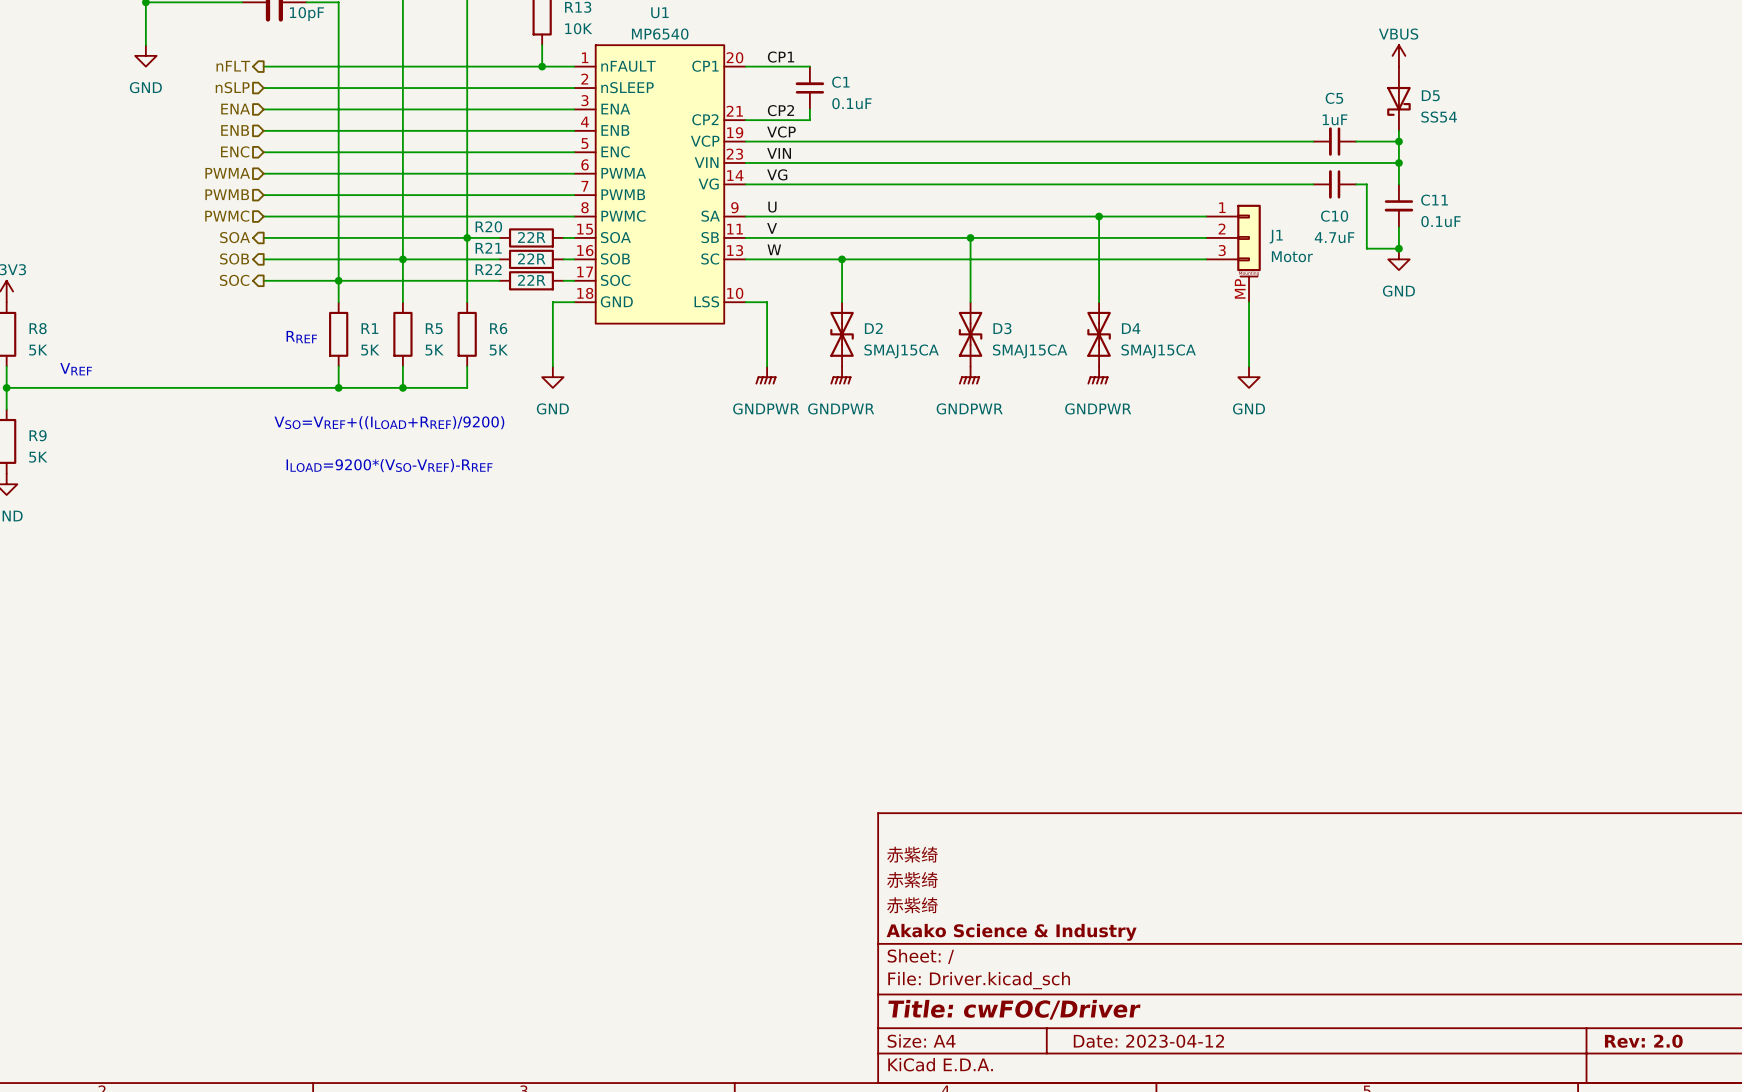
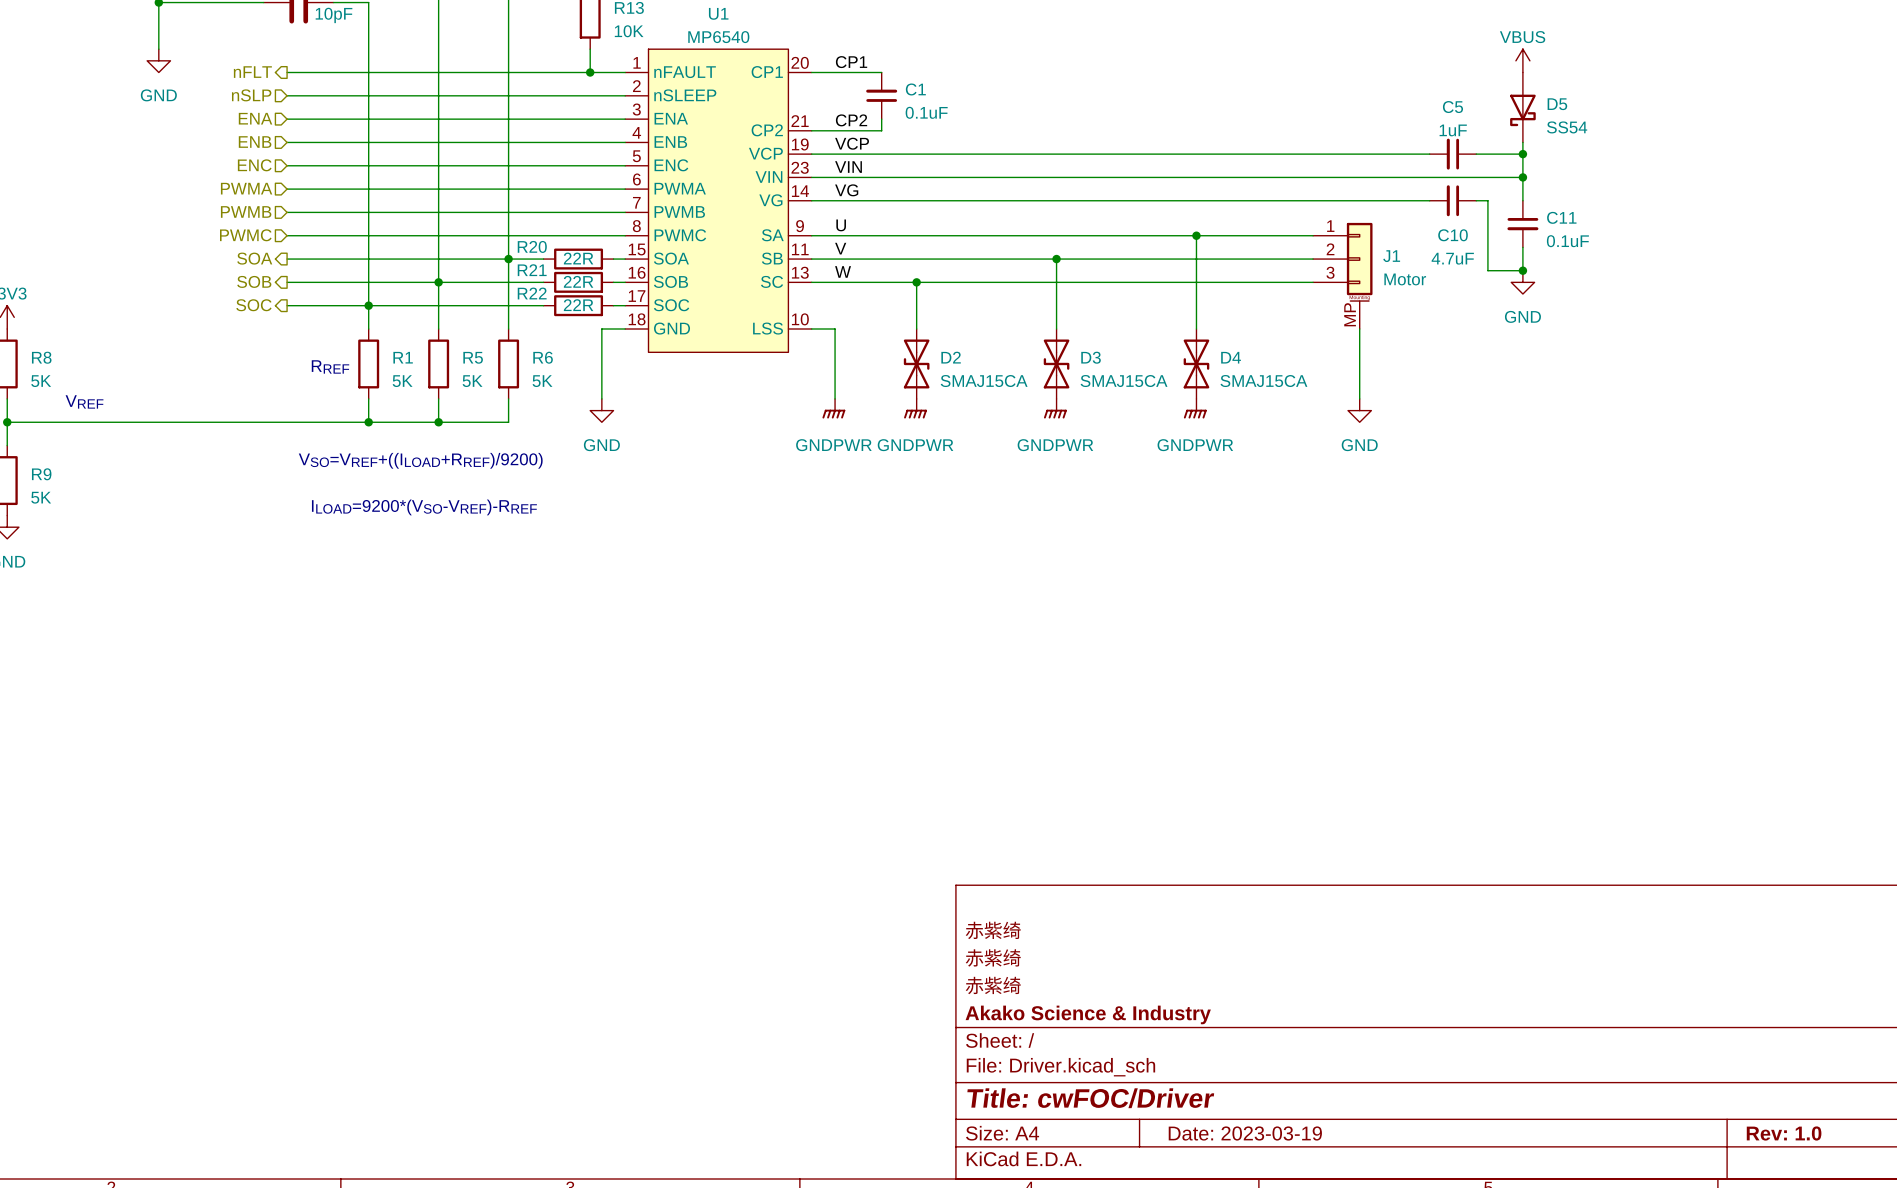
title block: Date: 2023-04-12 (1148, 1041) -> Date: 2023-03-19 (1245, 1133)
title block: Rev: 2.0 (1643, 1041) -> Rev: 1.0 (1784, 1133)

